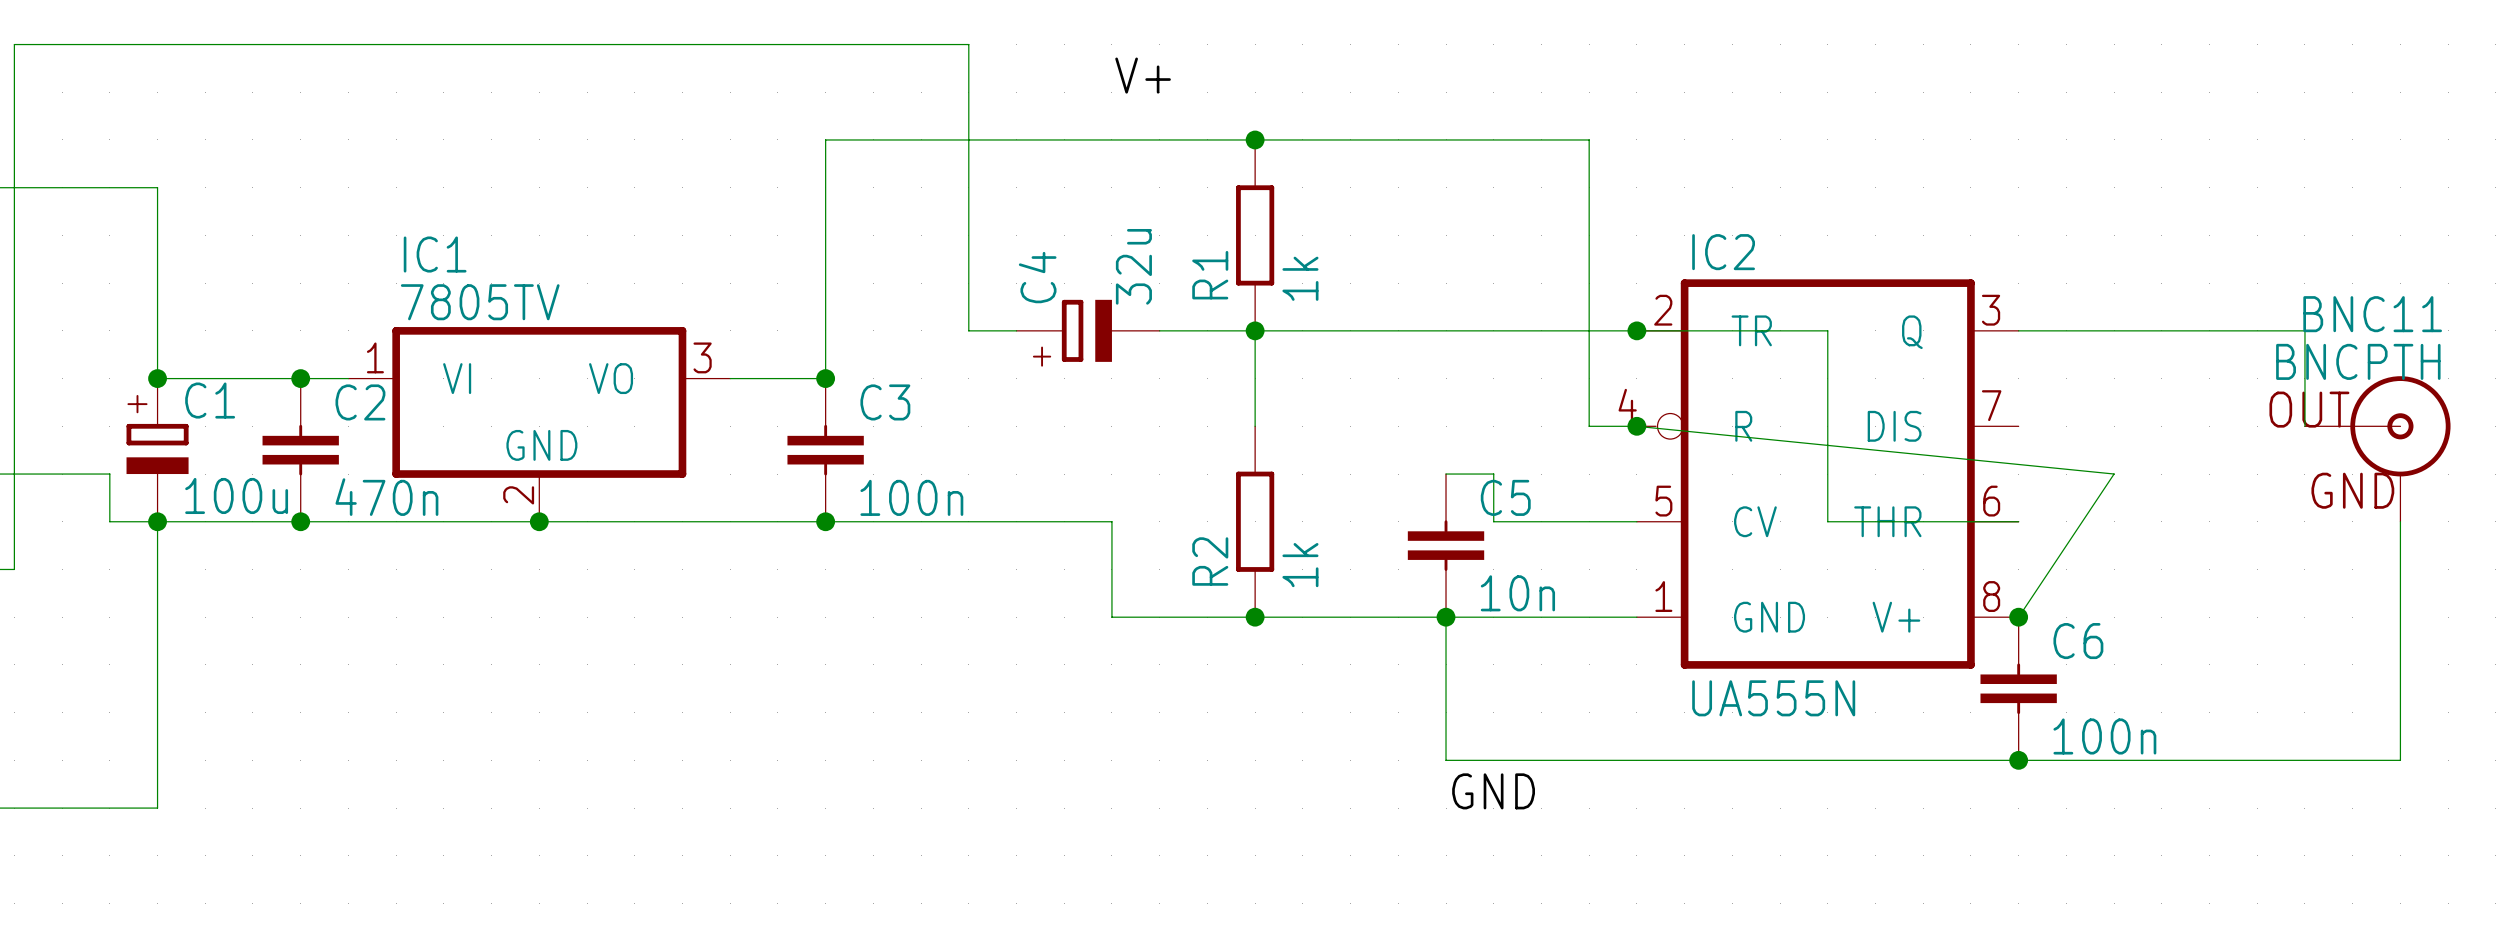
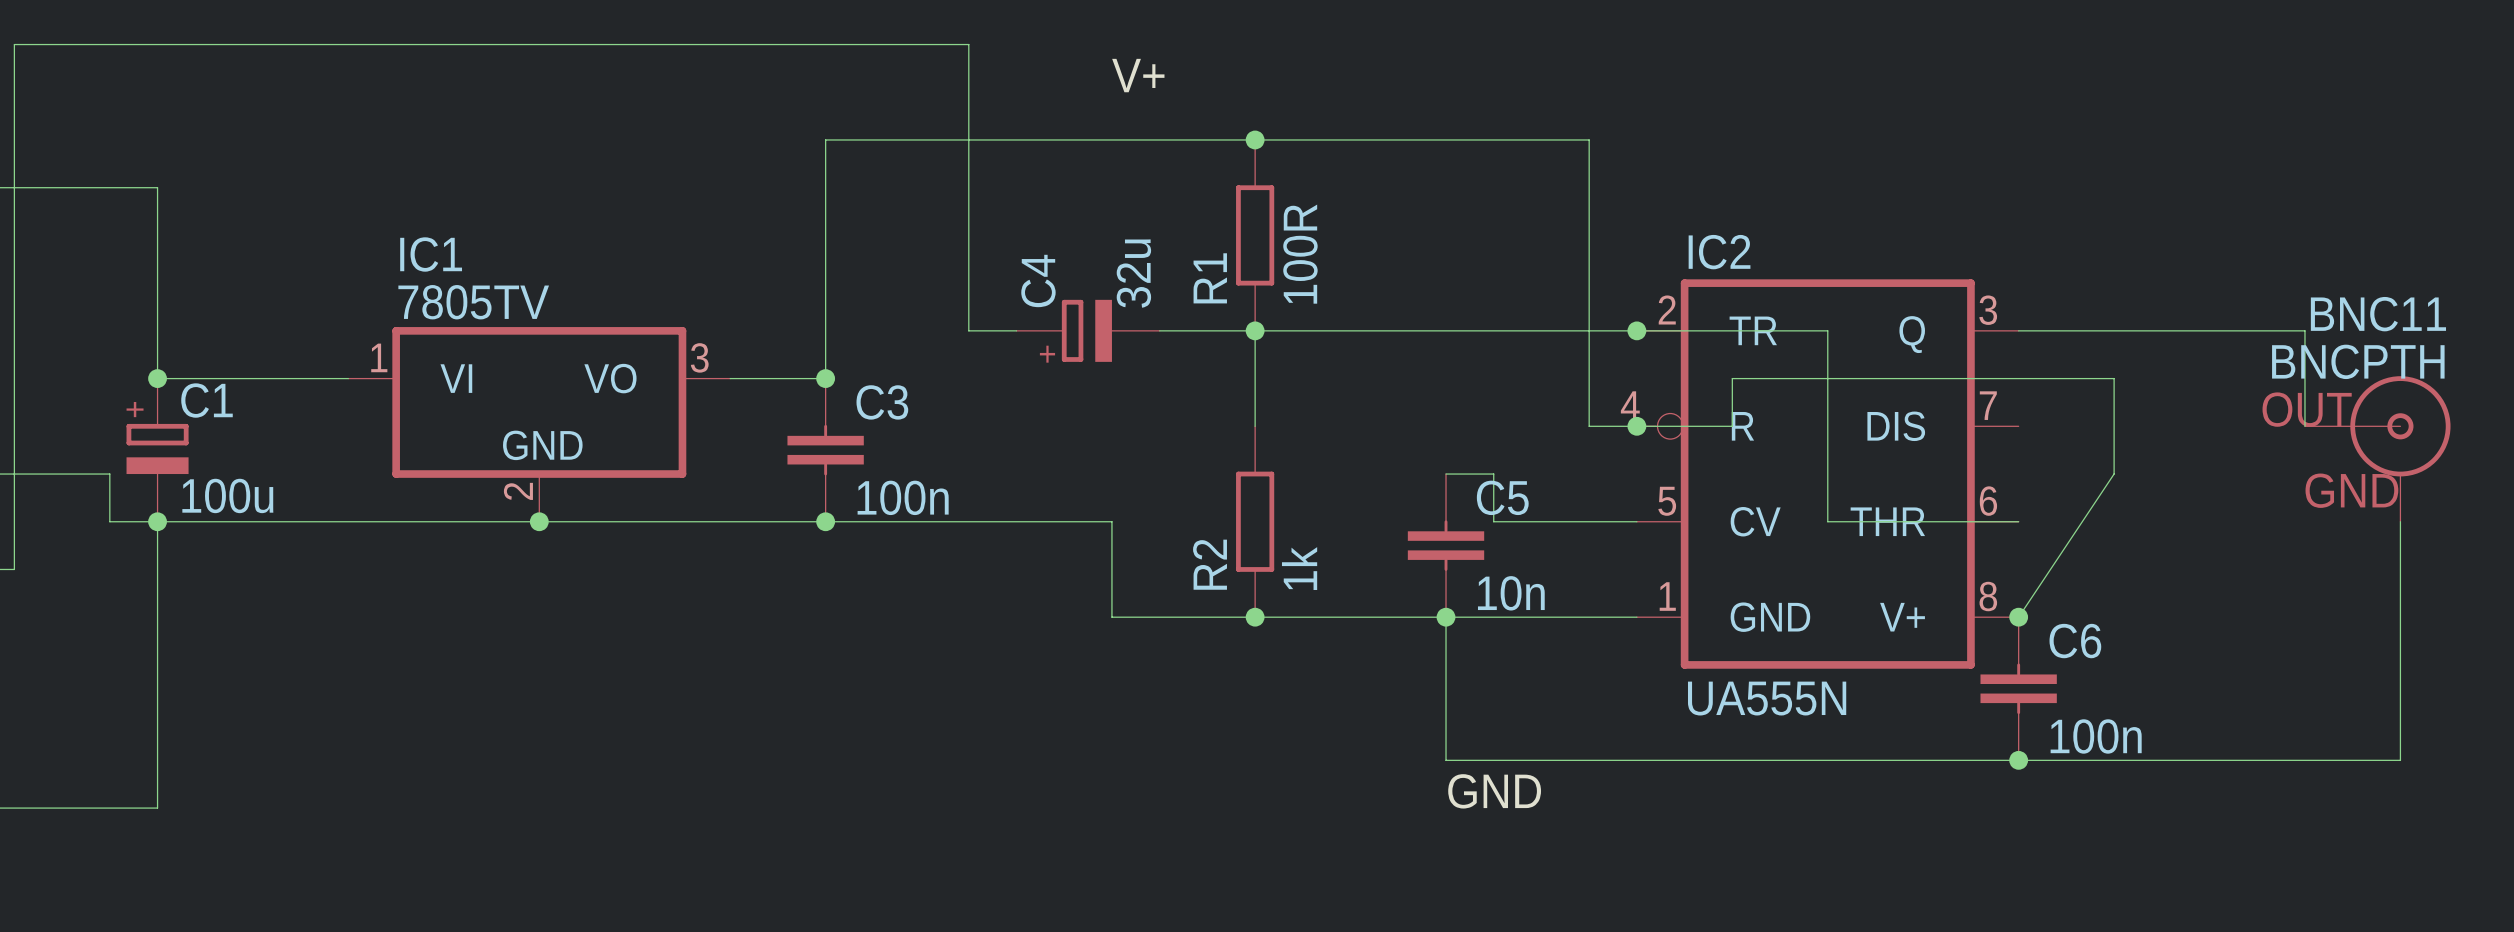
R1 value: 1k (1300, 278) -> 100R (1300, 254)
junction: (300, 378) -> none
wire: (1636, 426) (2114, 474) -> (1636, 426) (1732, 426) (1732, 378) (2114, 378) (2114, 474)
C2: 470n (300, 450) -> none
junction: (300, 521) -> none

